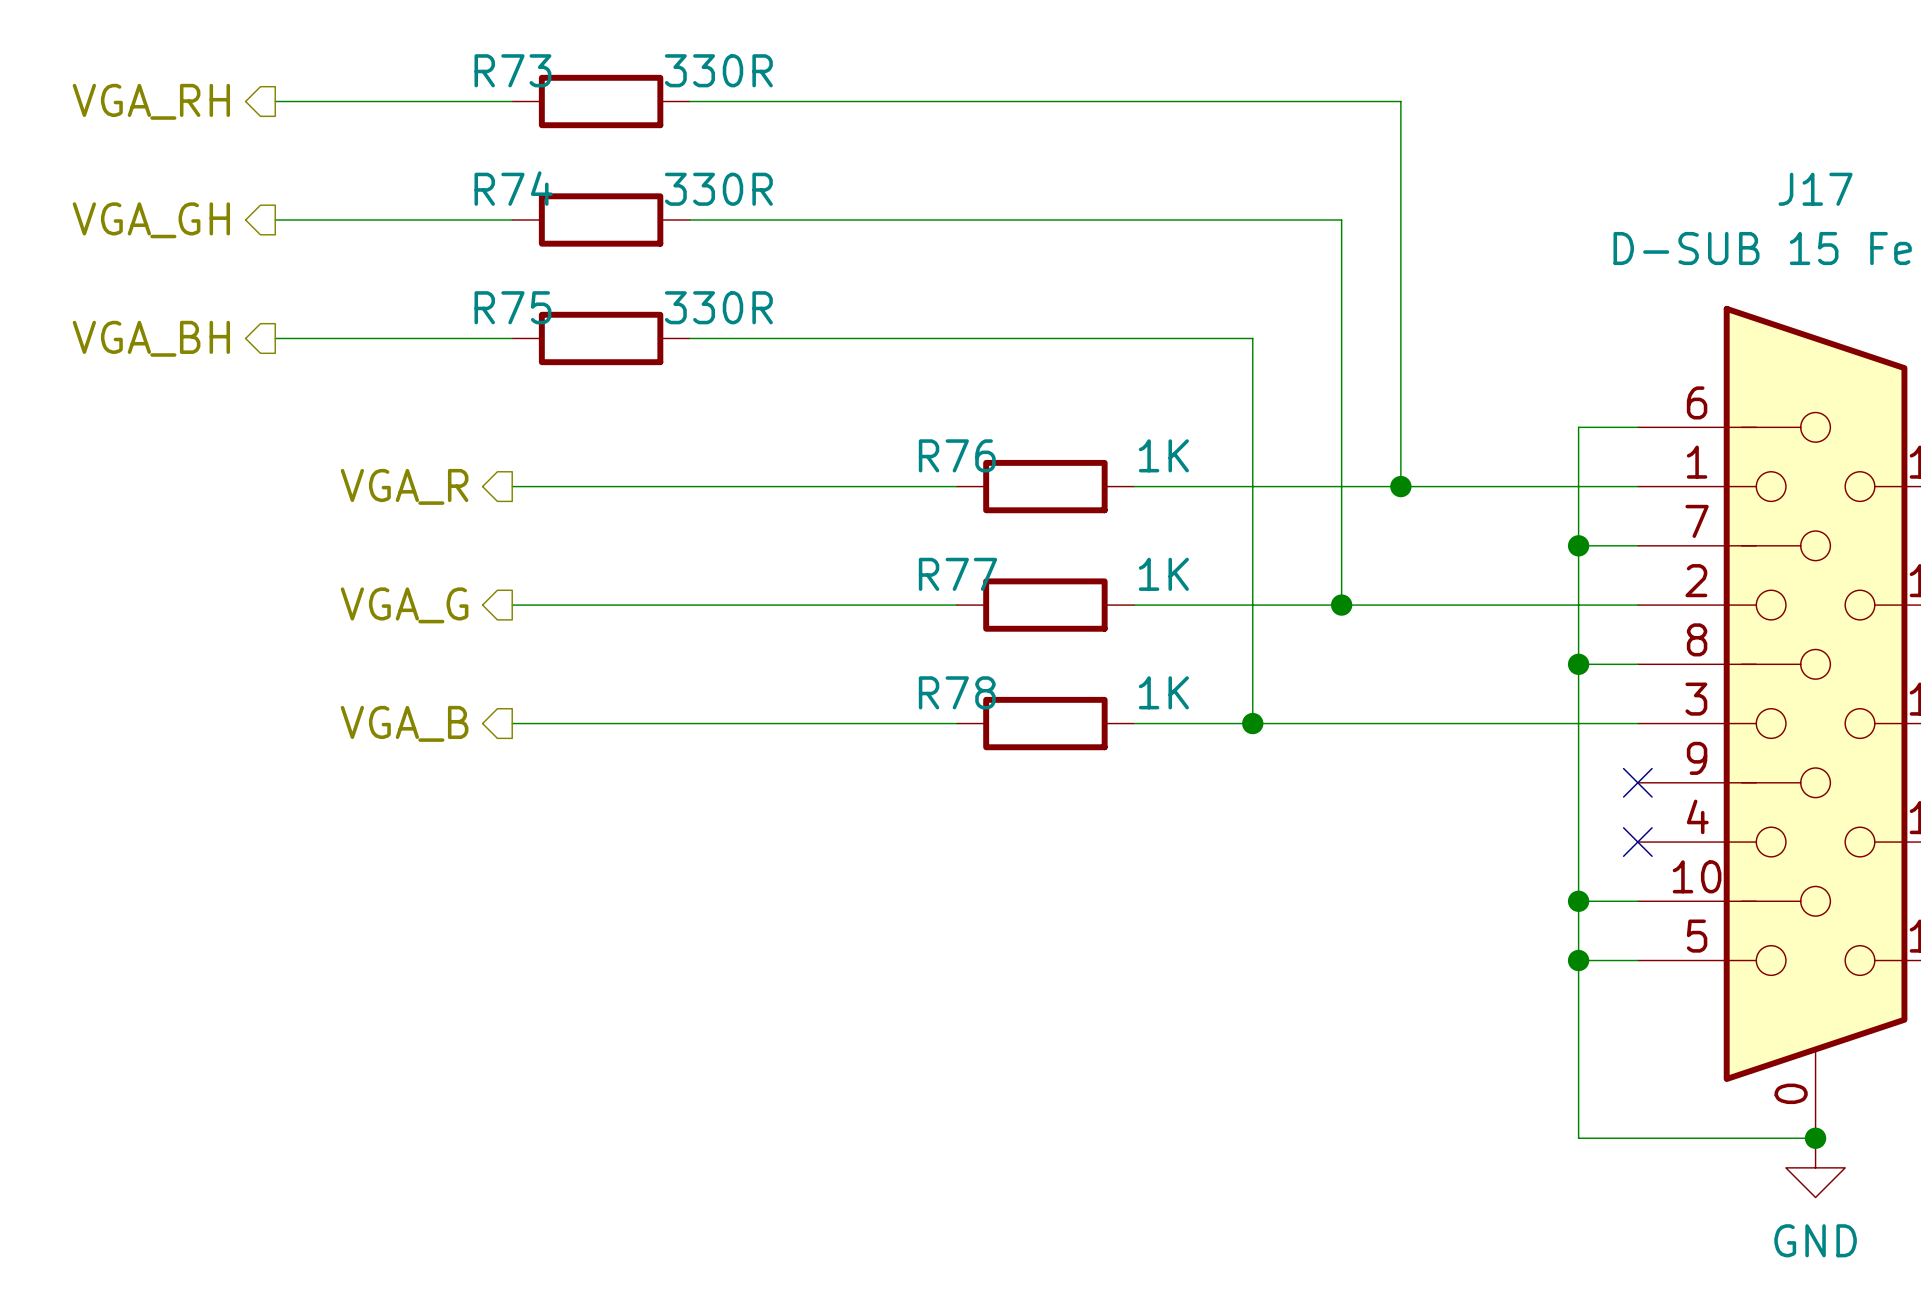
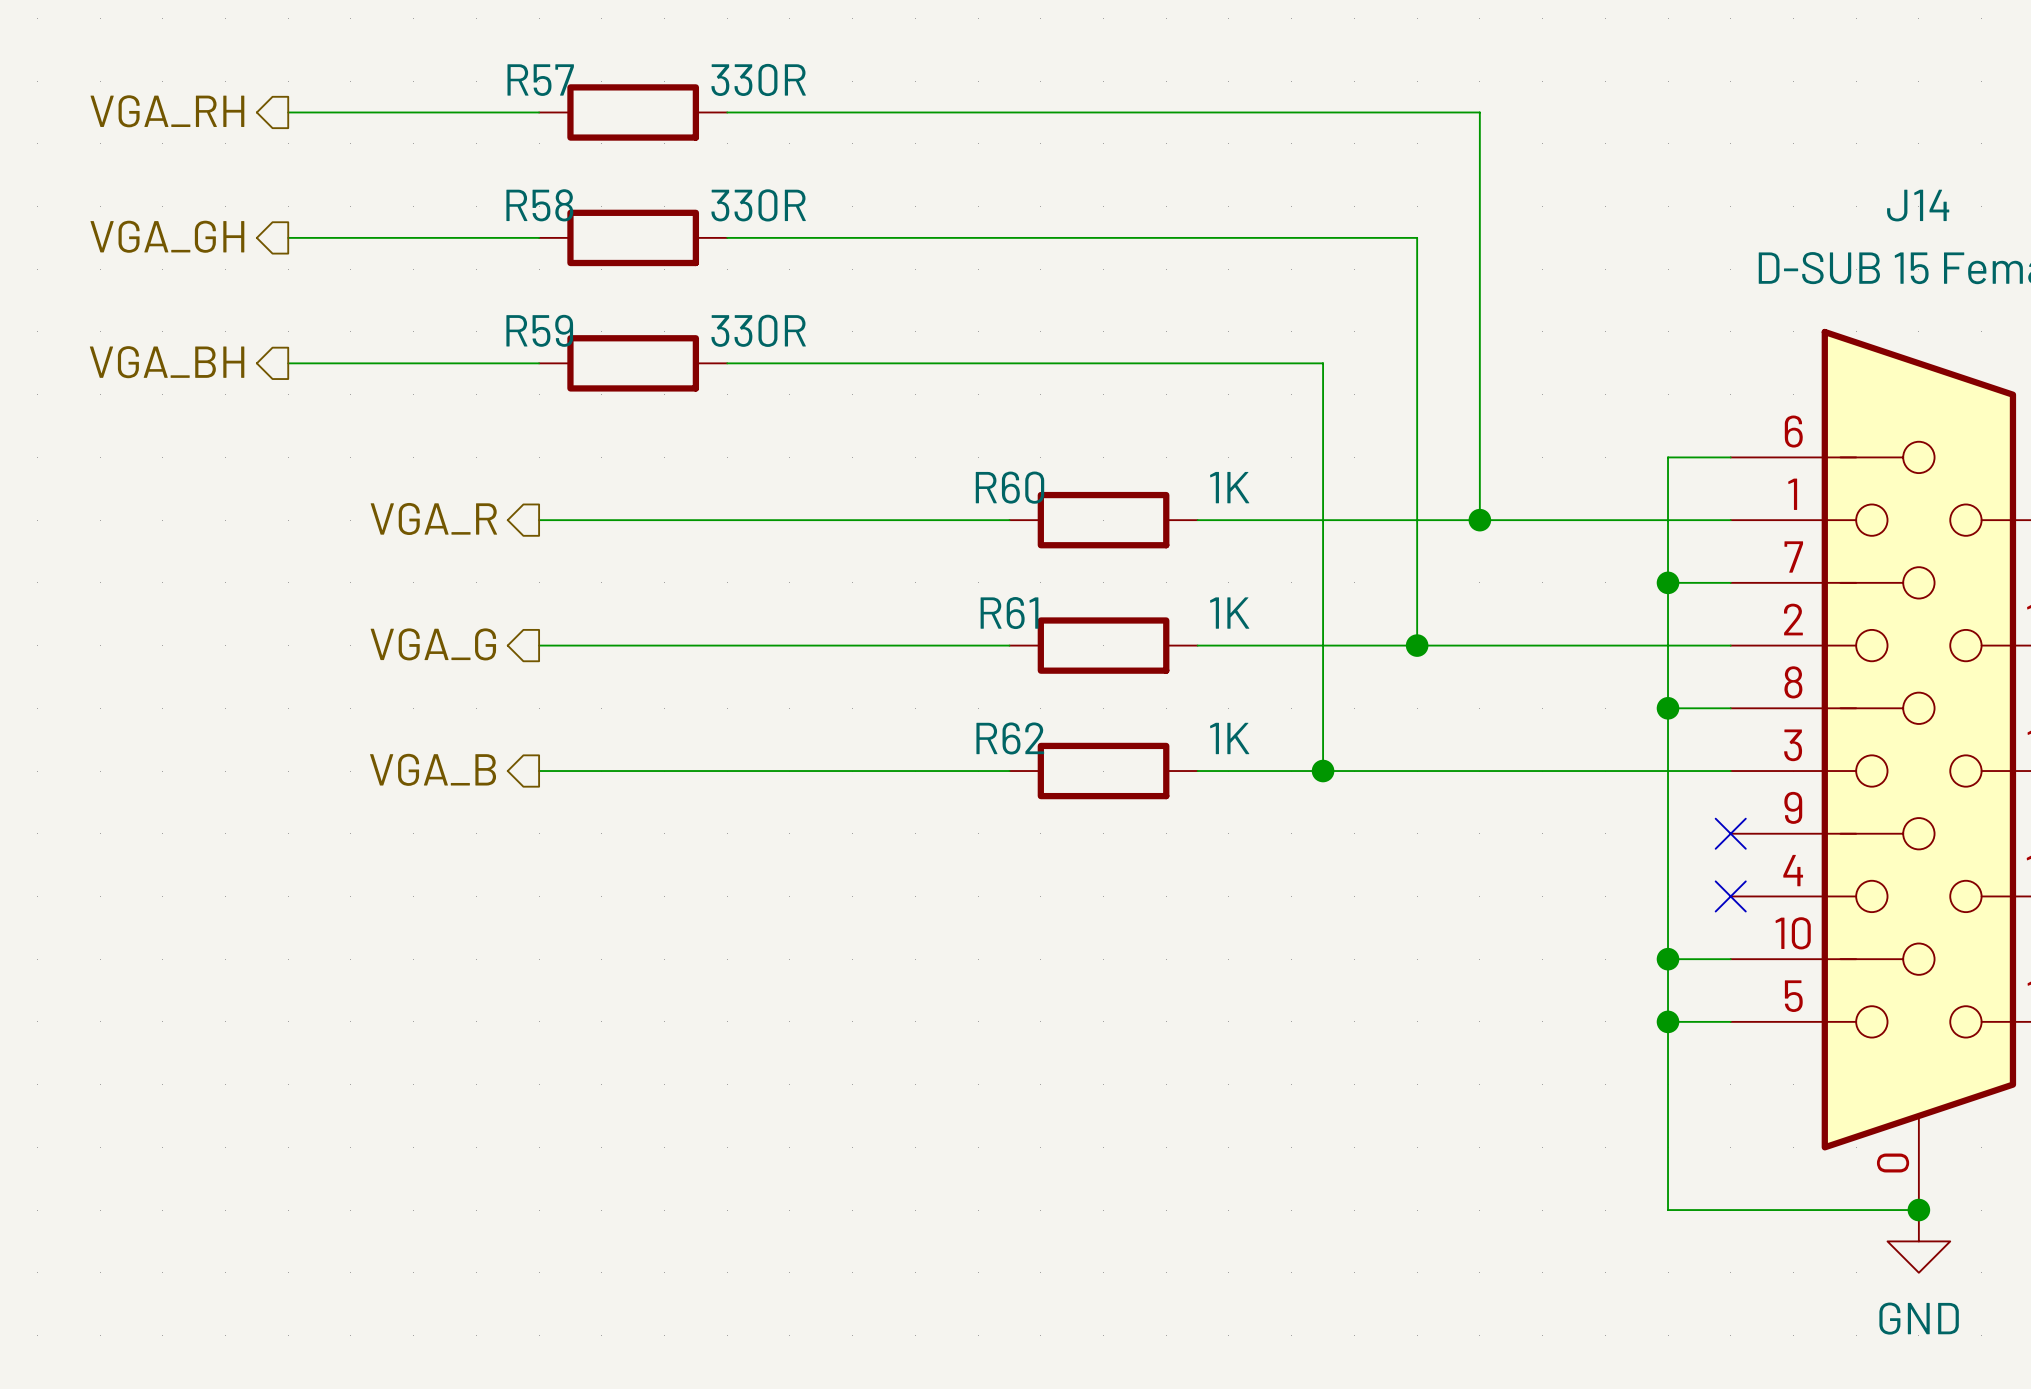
R73 name: R73 (512, 70) -> R57 (540, 80)
R74 name: R74 (513, 188) -> R58 (539, 205)
J17 name: J17 (1815, 189) -> J14 (1918, 205)
R75 name: R75 (512, 307) -> R59 (539, 330)
R76 name: R76 (957, 455) -> R60 (1009, 487)
R77 name: R77 (957, 574) -> R61 (1009, 613)
R78 name: R78 (957, 692) -> R62 (1010, 738)

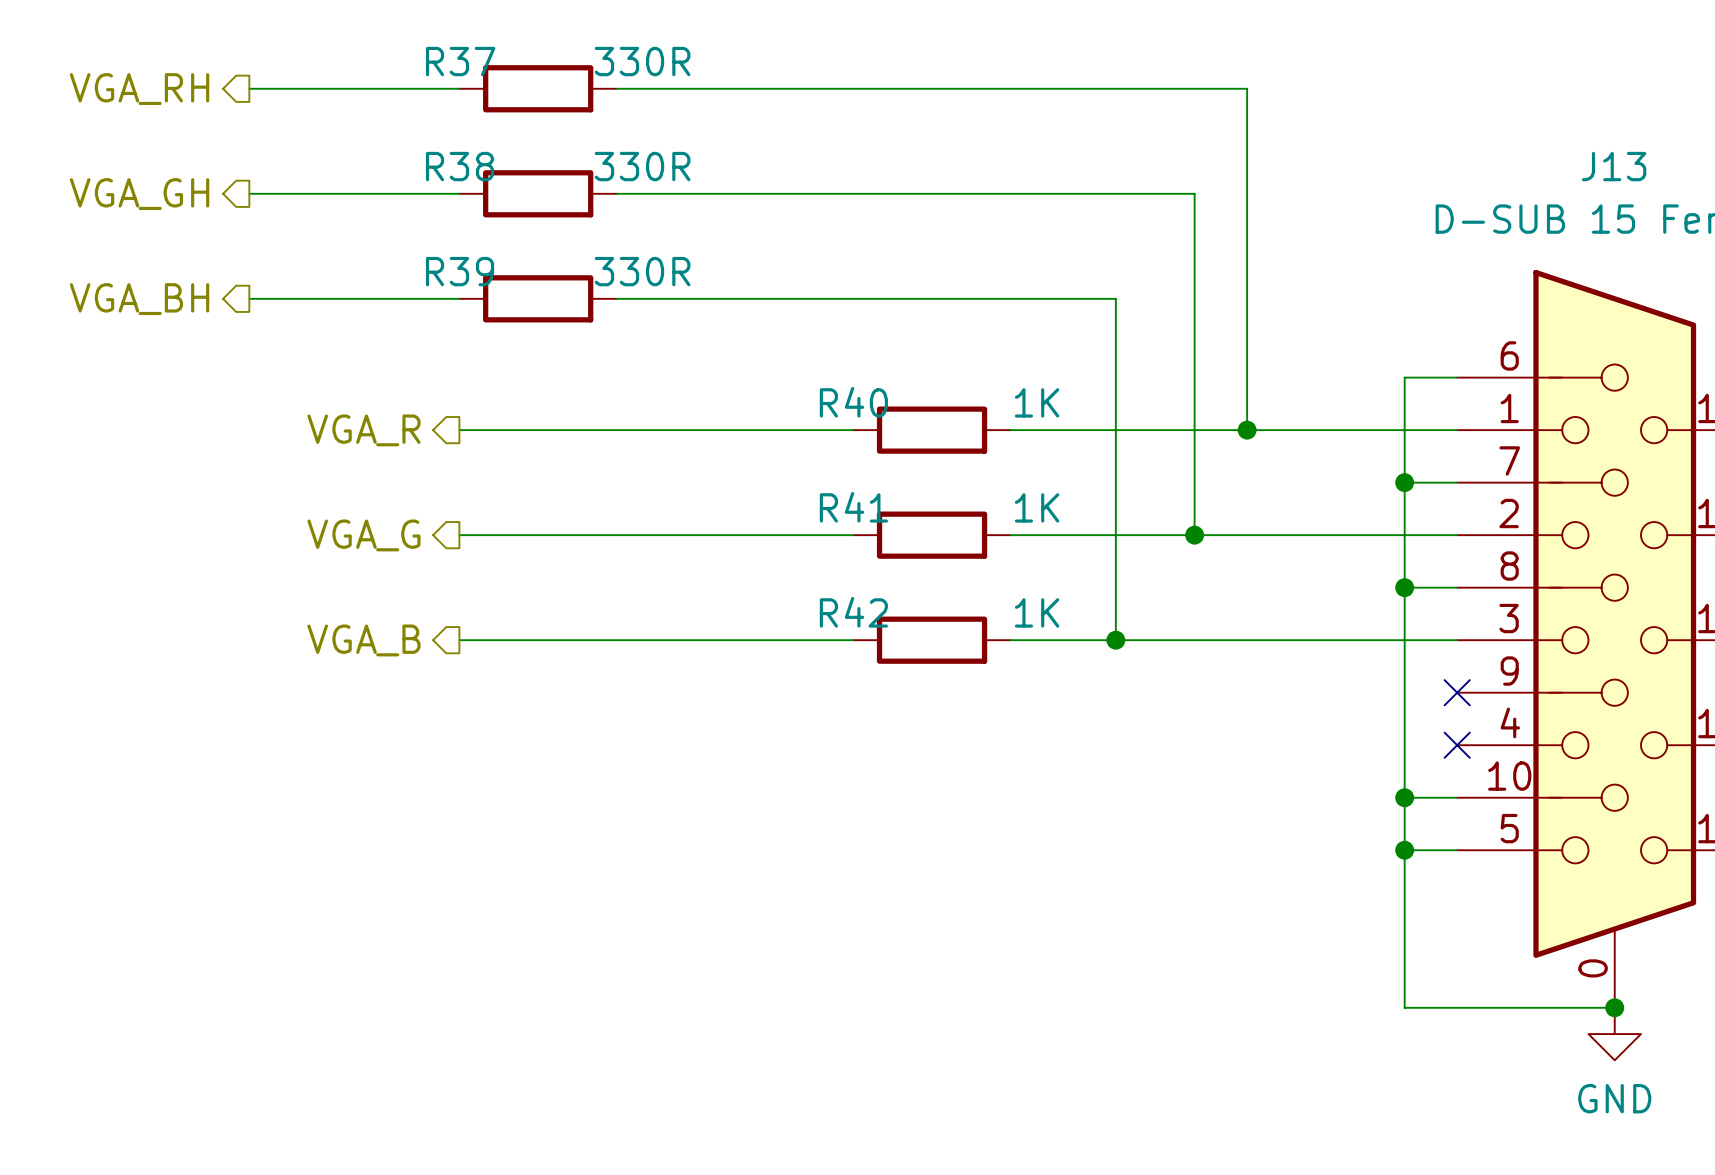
R57 name: R57 (540, 80) -> R37 (460, 61)
R58 name: R58 (539, 205) -> R38 (460, 166)
J14 name: J14 (1918, 205) -> J13 (1614, 166)
R59 name: R59 (539, 330) -> R39 (460, 271)
R60 name: R60 (1009, 487) -> R40 (853, 402)
R61 name: R61 (1009, 613) -> R41 (853, 507)
R62 name: R62 (1010, 738) -> R42 (853, 612)

